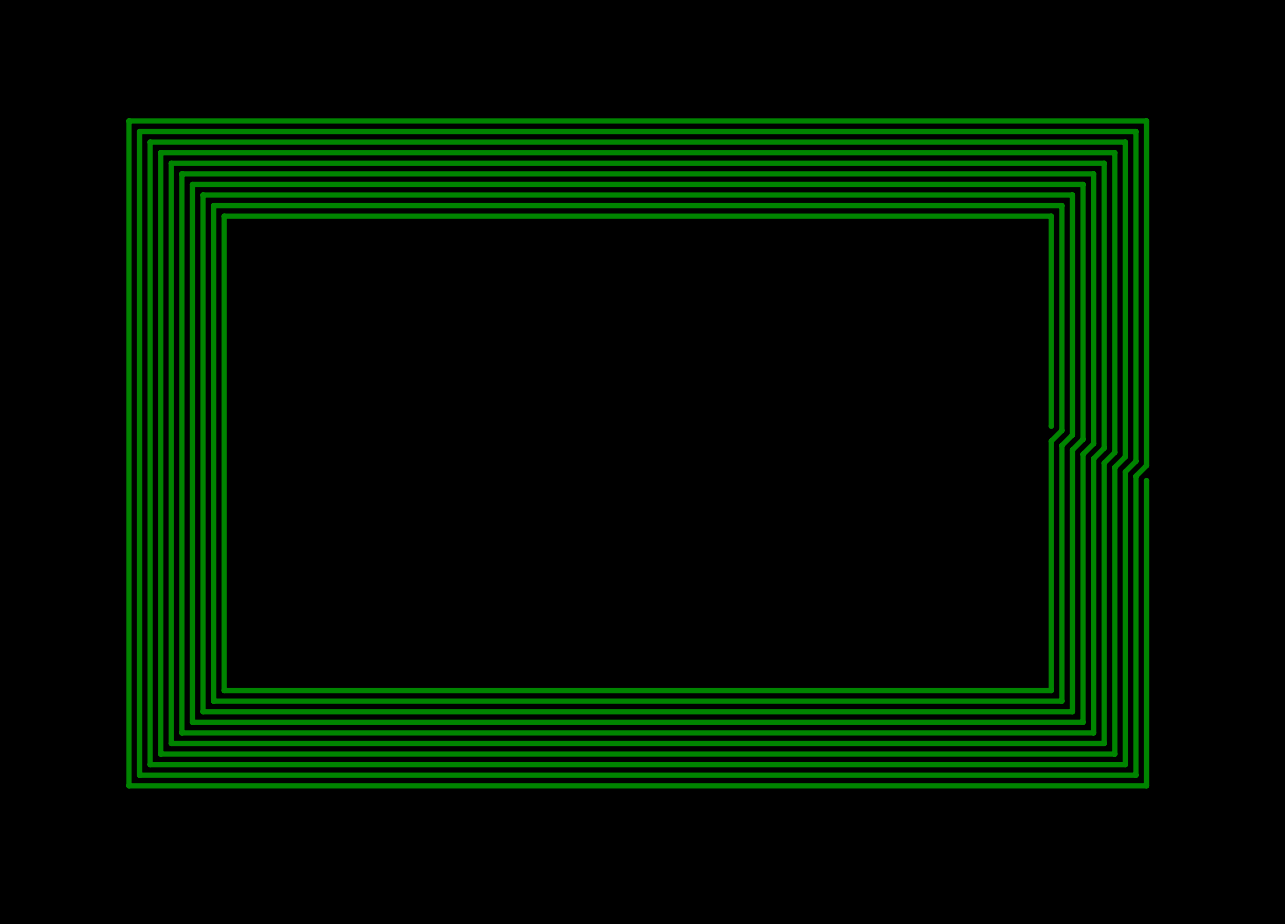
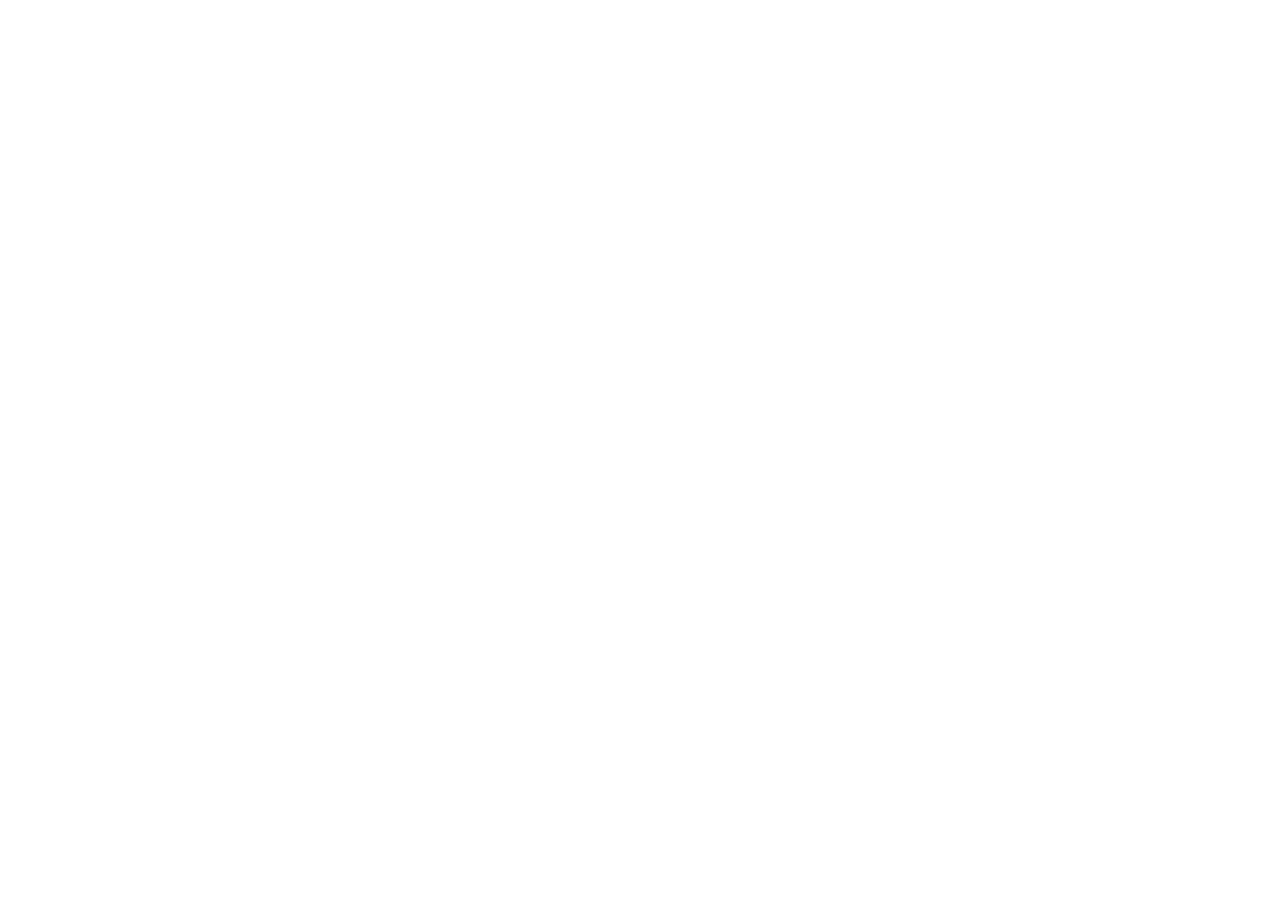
part: (637, 453) -> none

